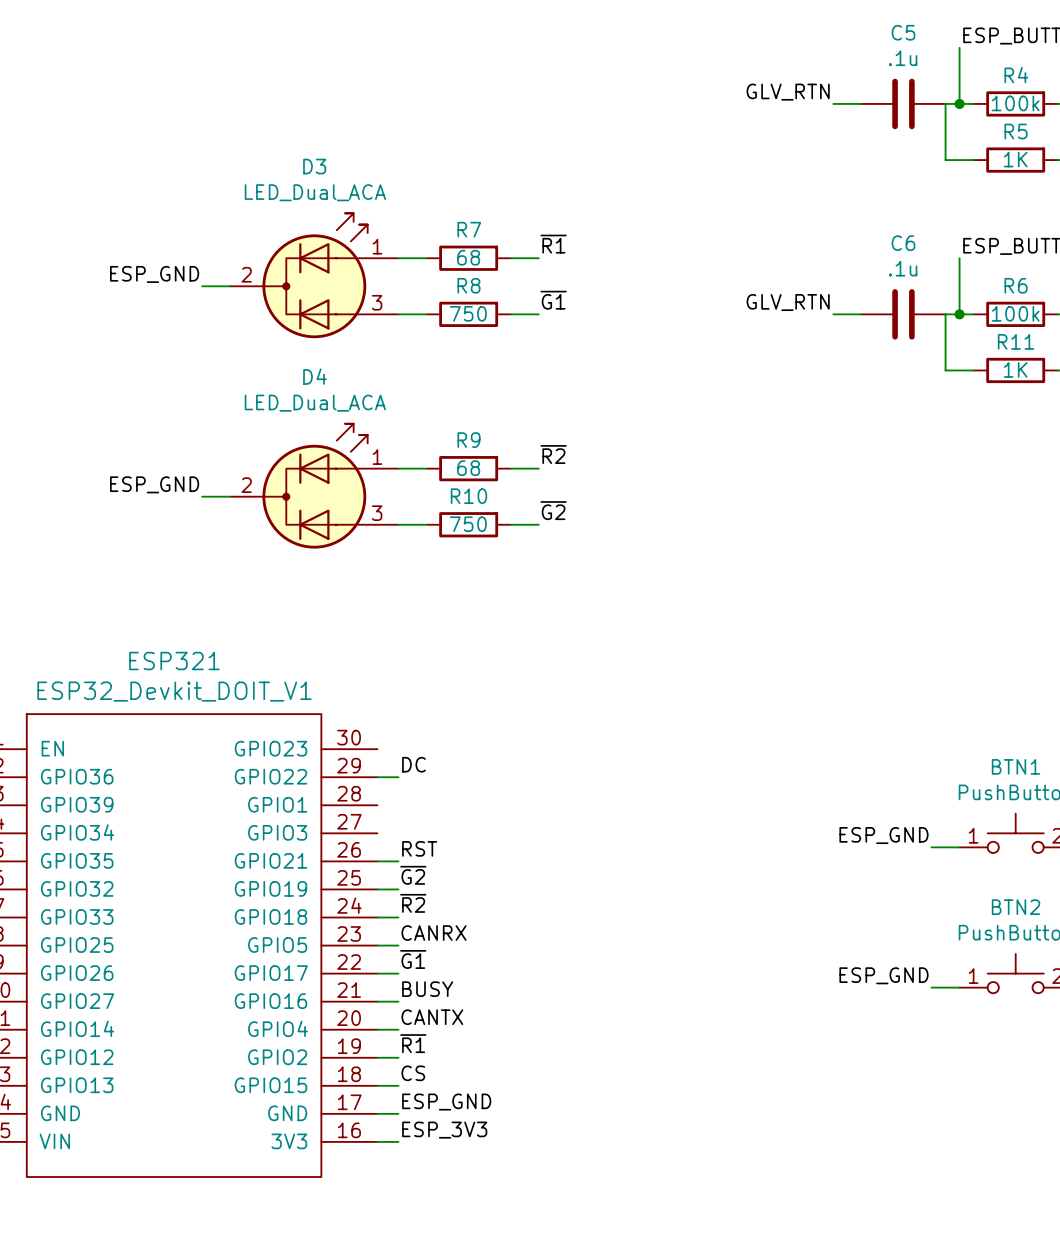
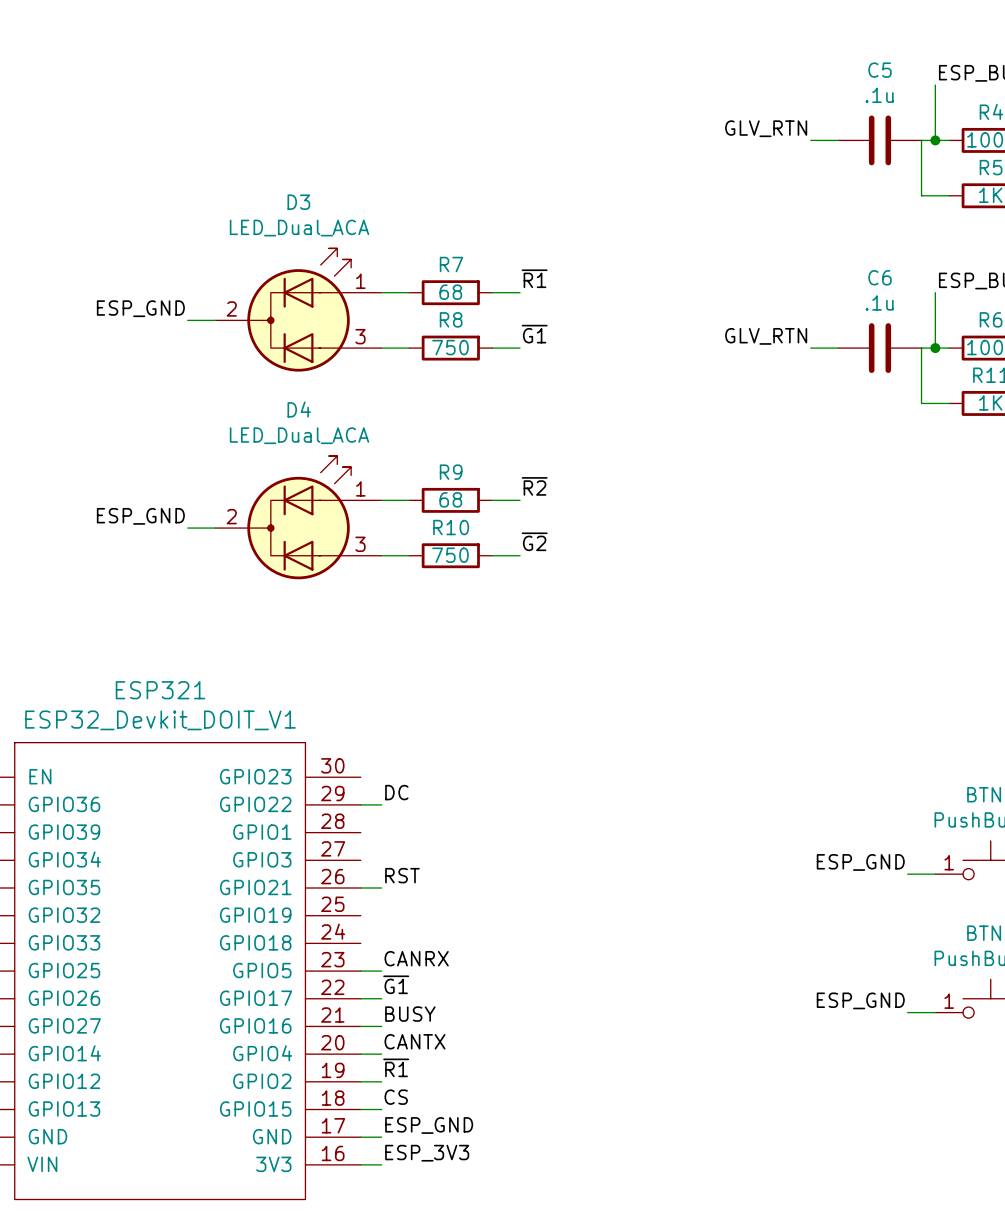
label: ~{G2} (413, 875) -> none
wire: (377, 889) (398, 889) -> none
label: ~{R2} (413, 903) -> none
wire: (377, 917) (398, 917) -> none

